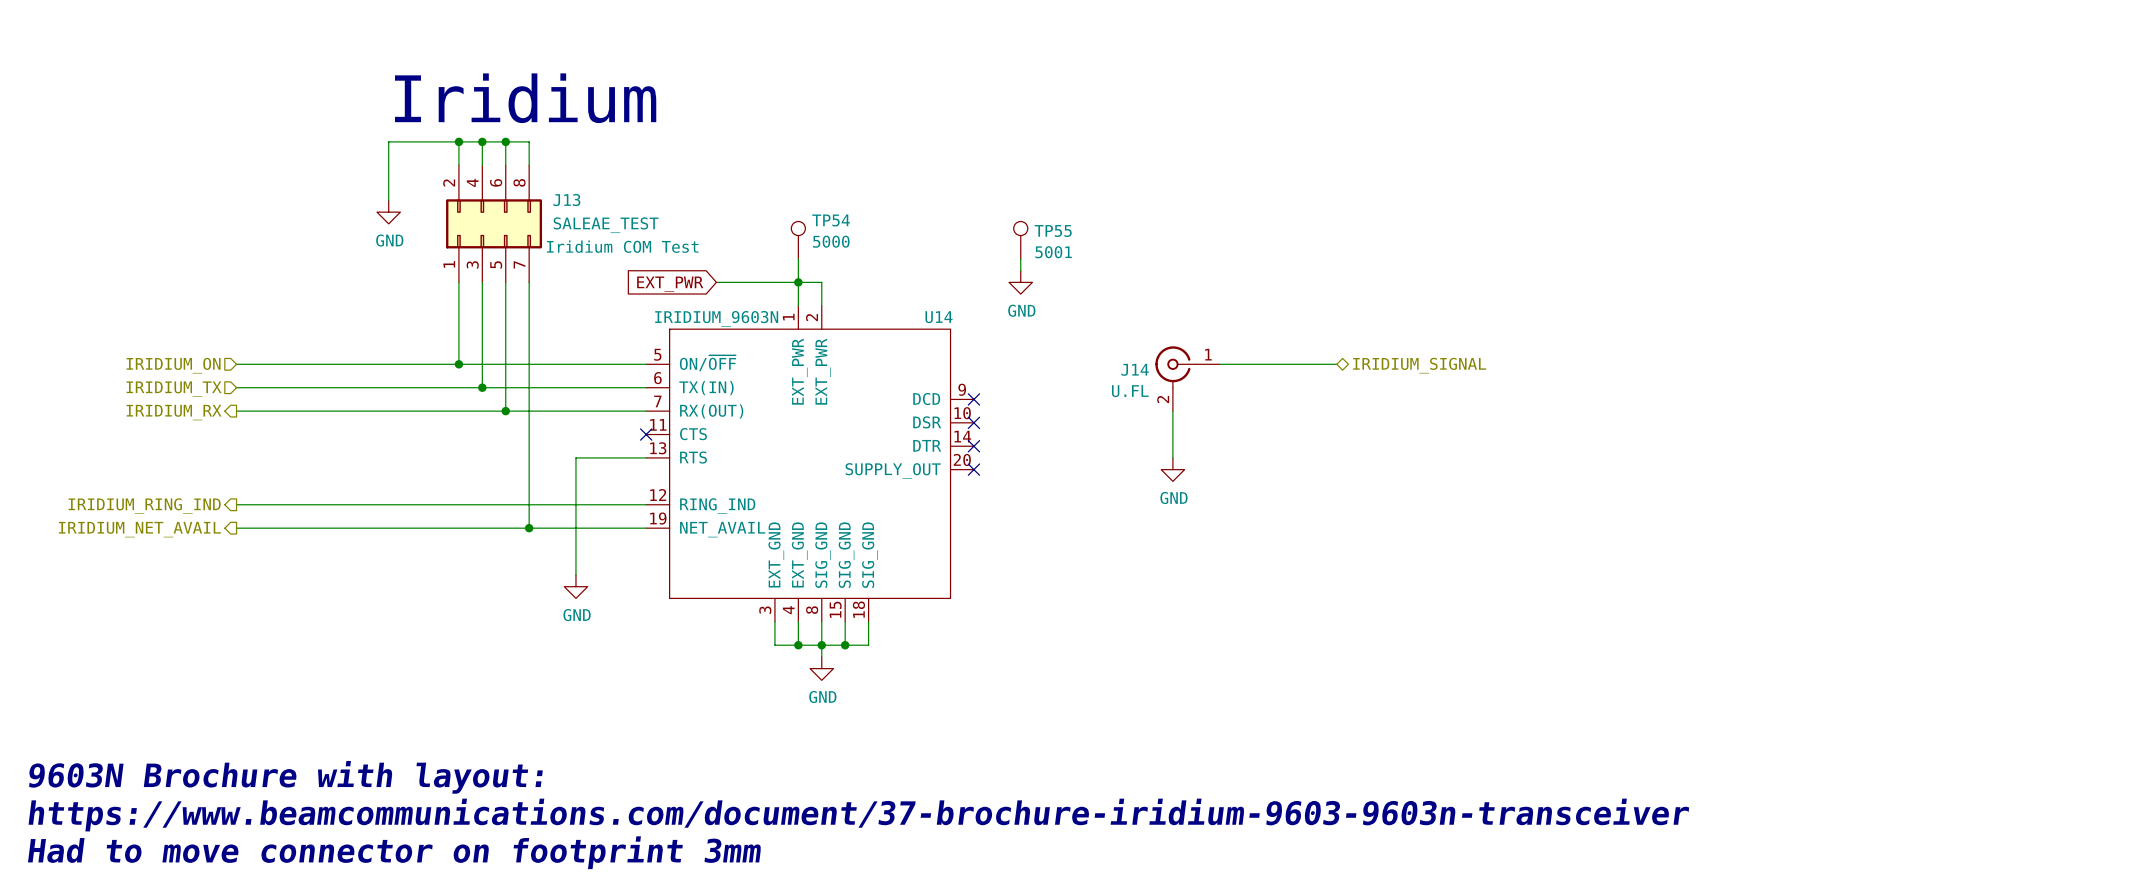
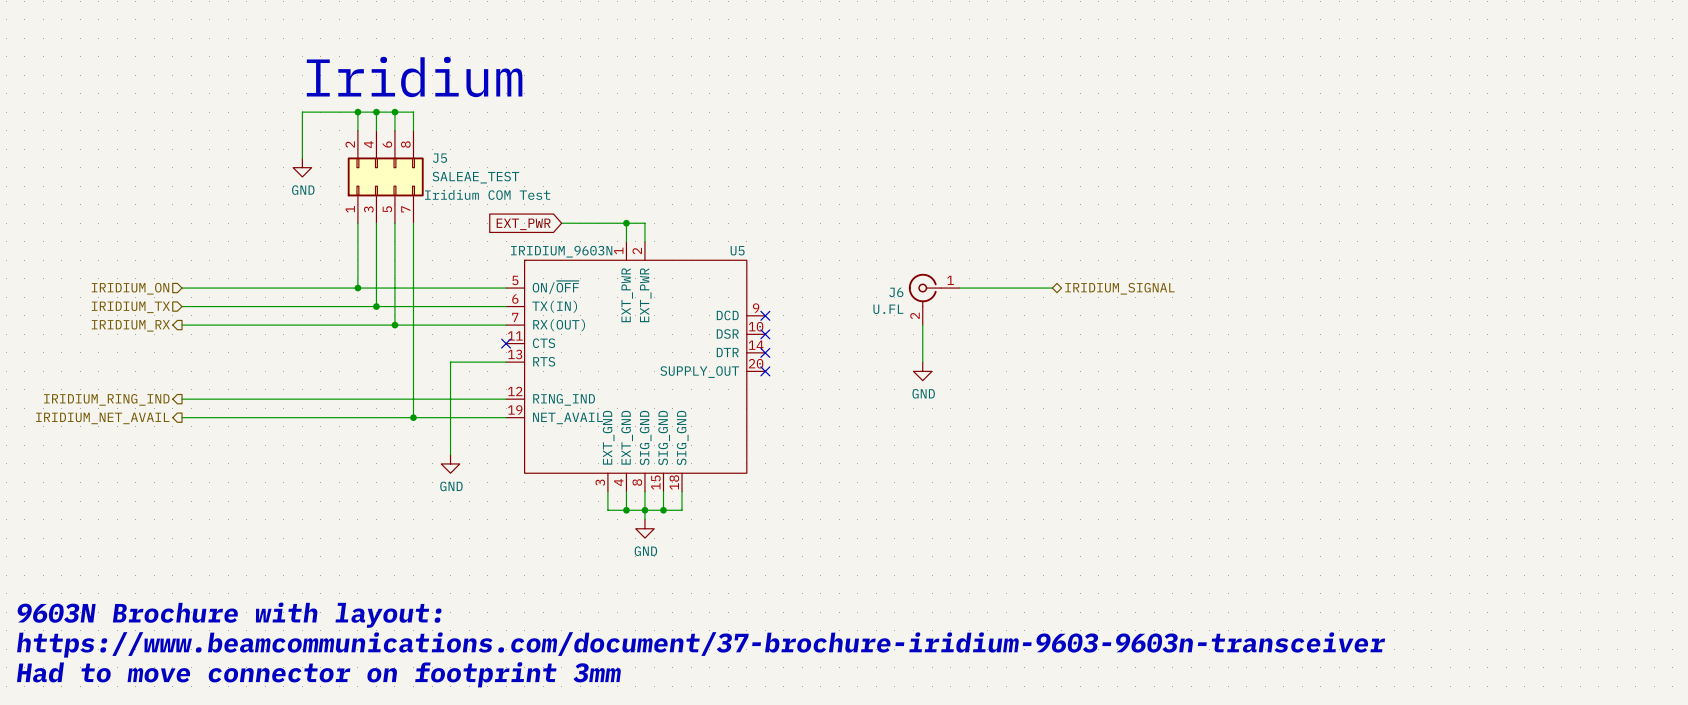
J13 name: J13 (566, 200) -> J5 (440, 158)
TP54: 5000 (798, 240) -> none
TP55: 5001 (1020, 240) -> none
wire: (798, 258) (798, 282) -> none
wire: (1020, 258) (1020, 270) -> none
power symbol: GND (1020, 282) -> none
U14 name: U14 (939, 317) -> U5 (737, 250)
J14 name: J14 (1135, 369) -> J6 (896, 292)

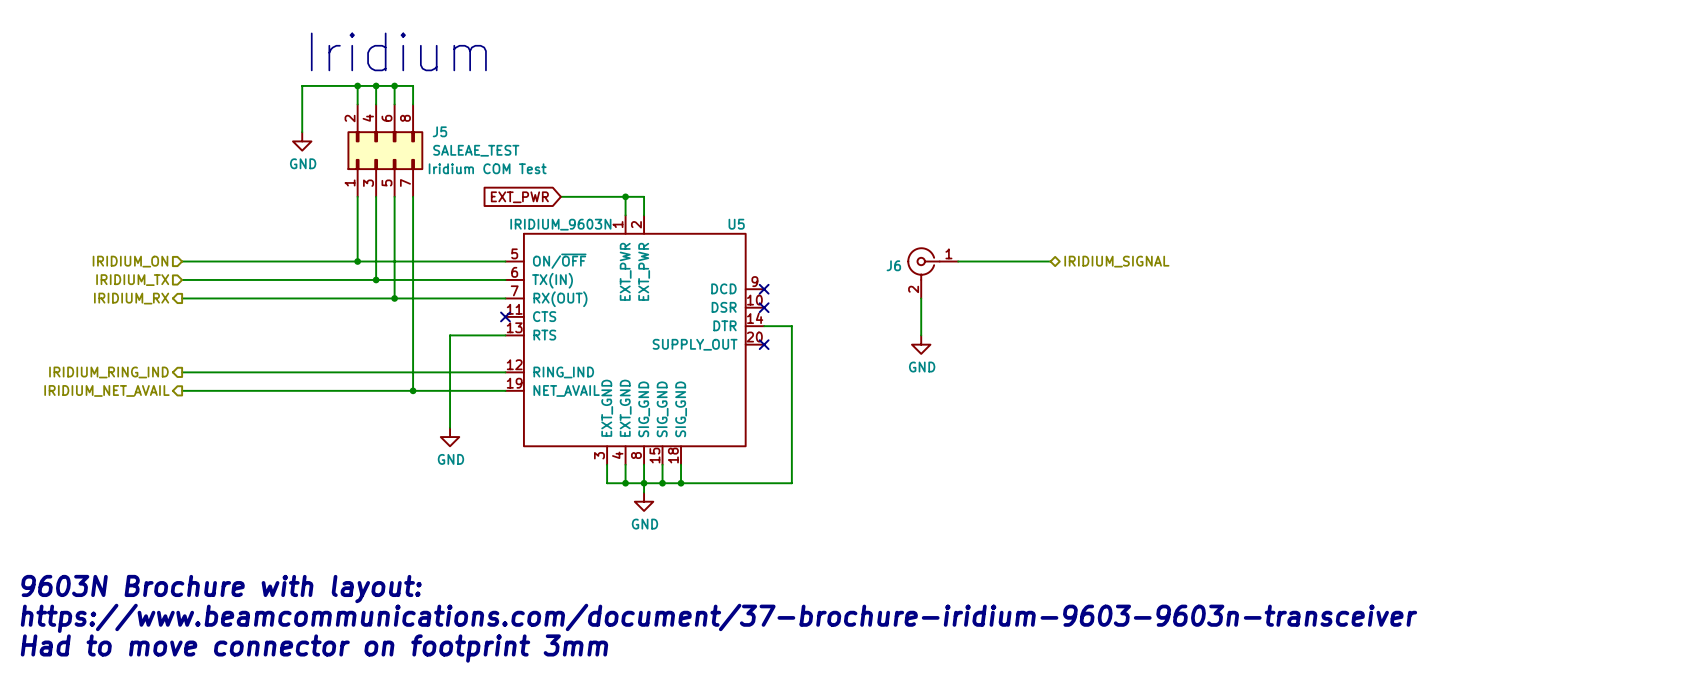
J6 value: U.FL (888, 309) -> none
wire: none -> (764, 326) (791, 326) (791, 483) (681, 483)
no-connect mark: (765, 352) -> none
junction: none -> (681, 483)

